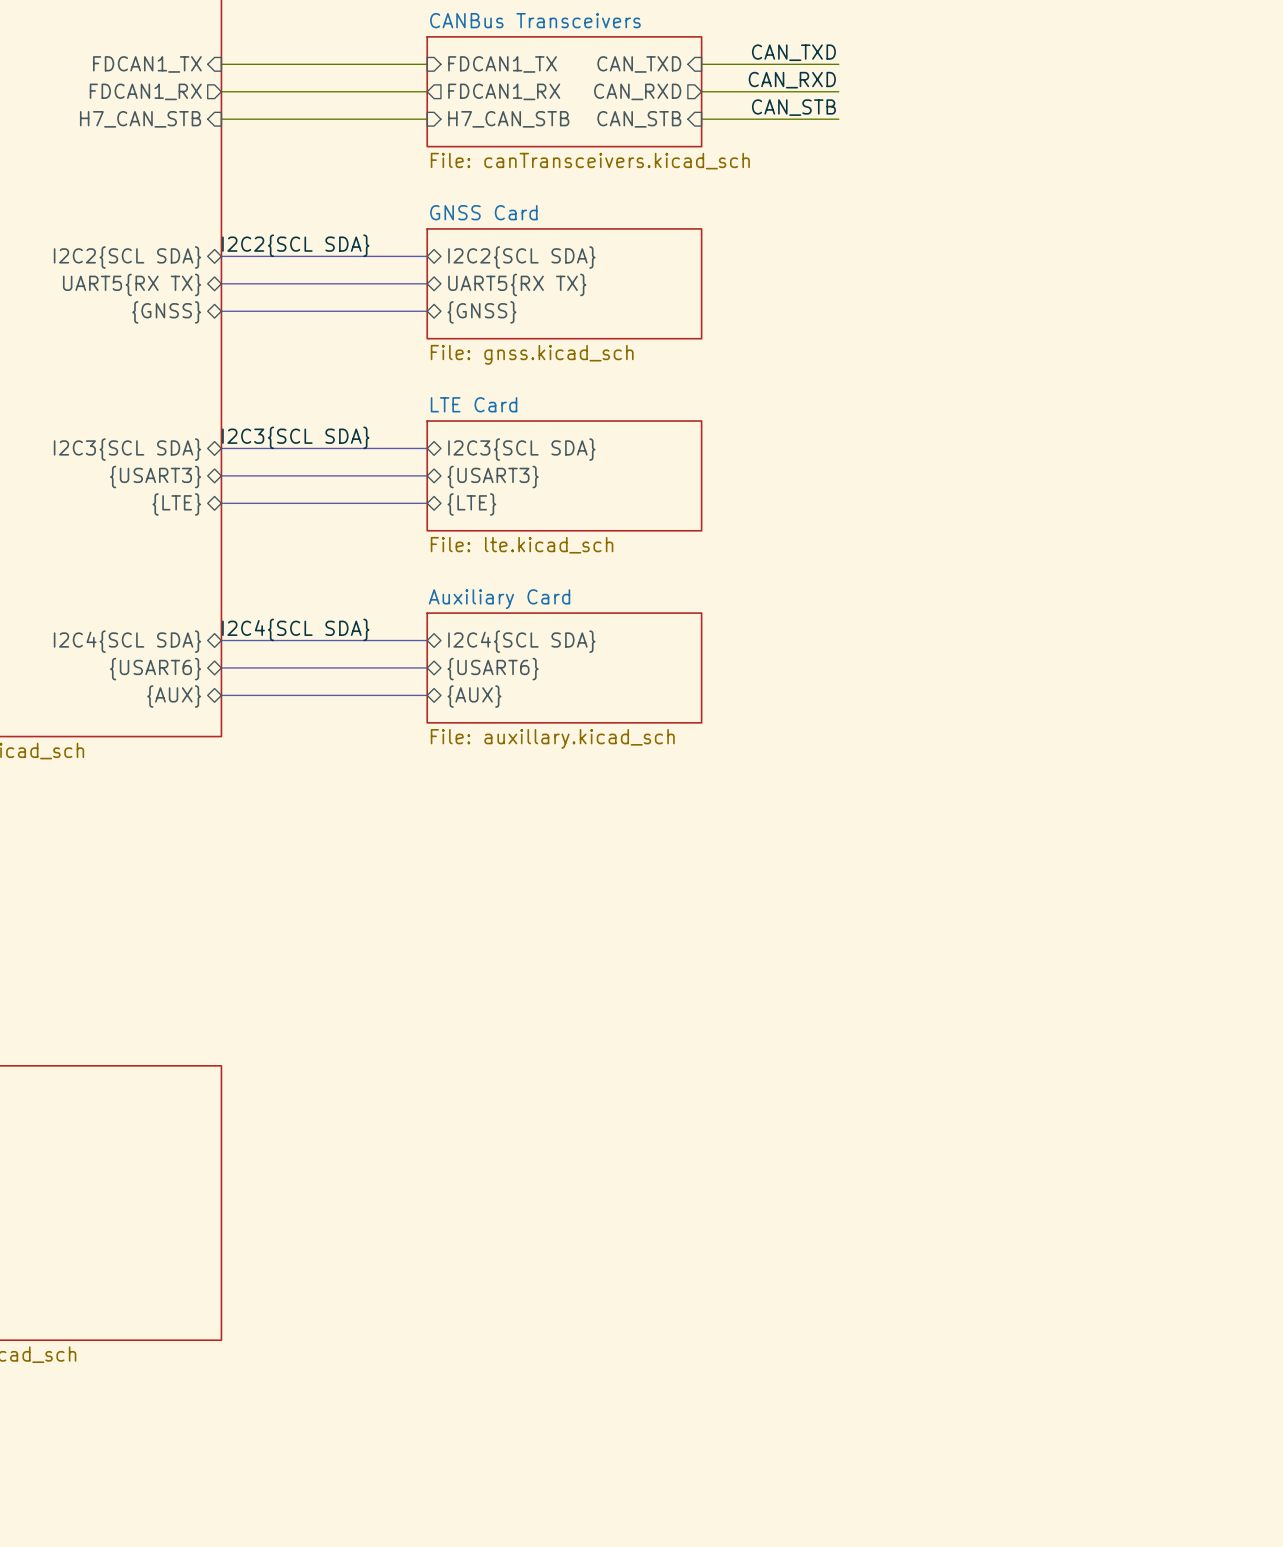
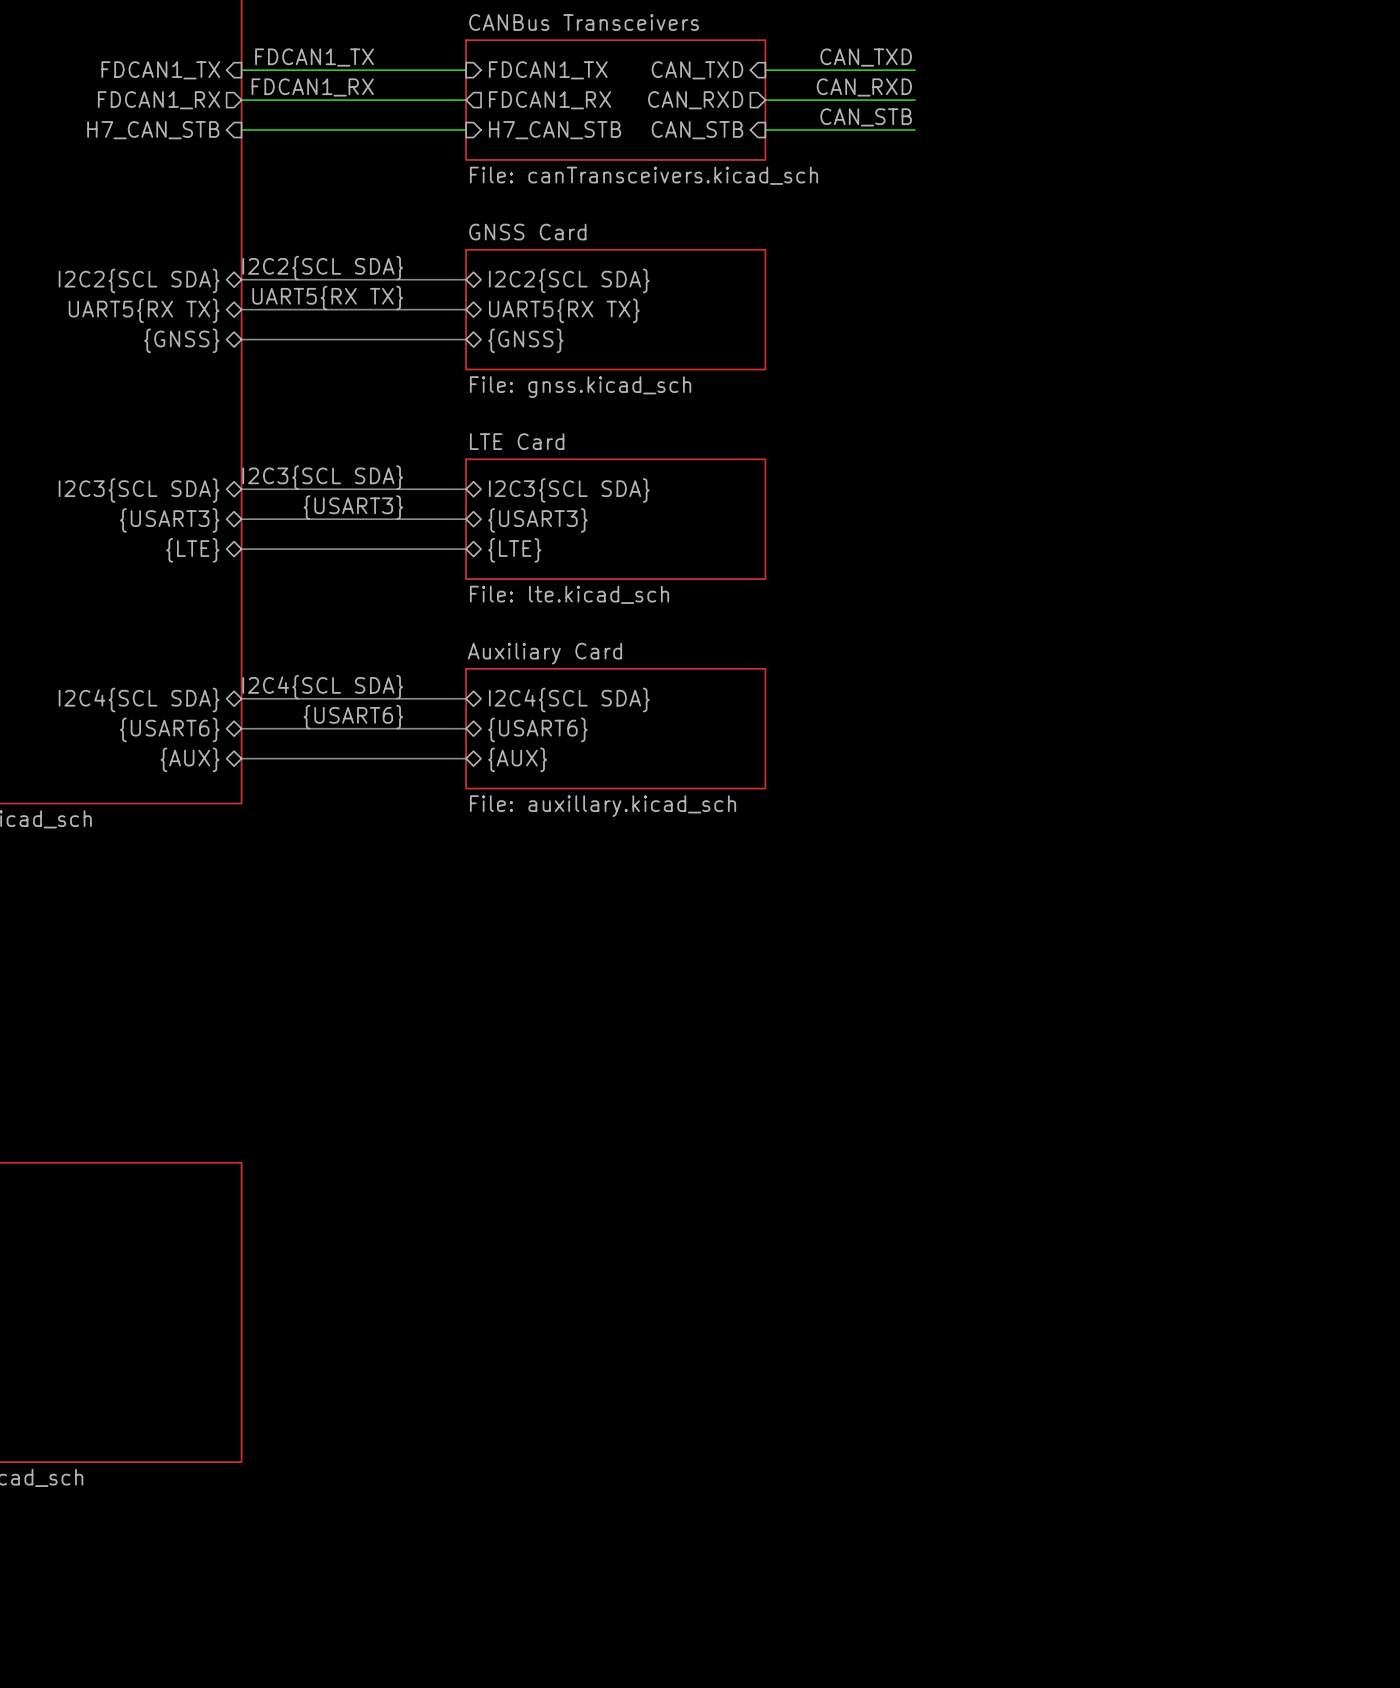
label: none -> FDCAN1_TX (314, 57)
label: none -> FDCAN1_RX (312, 87)
label: none -> UART5{RX TX} (327, 298)
label: none -> {USART3} (353, 507)
label: none -> {USART6} (353, 717)

